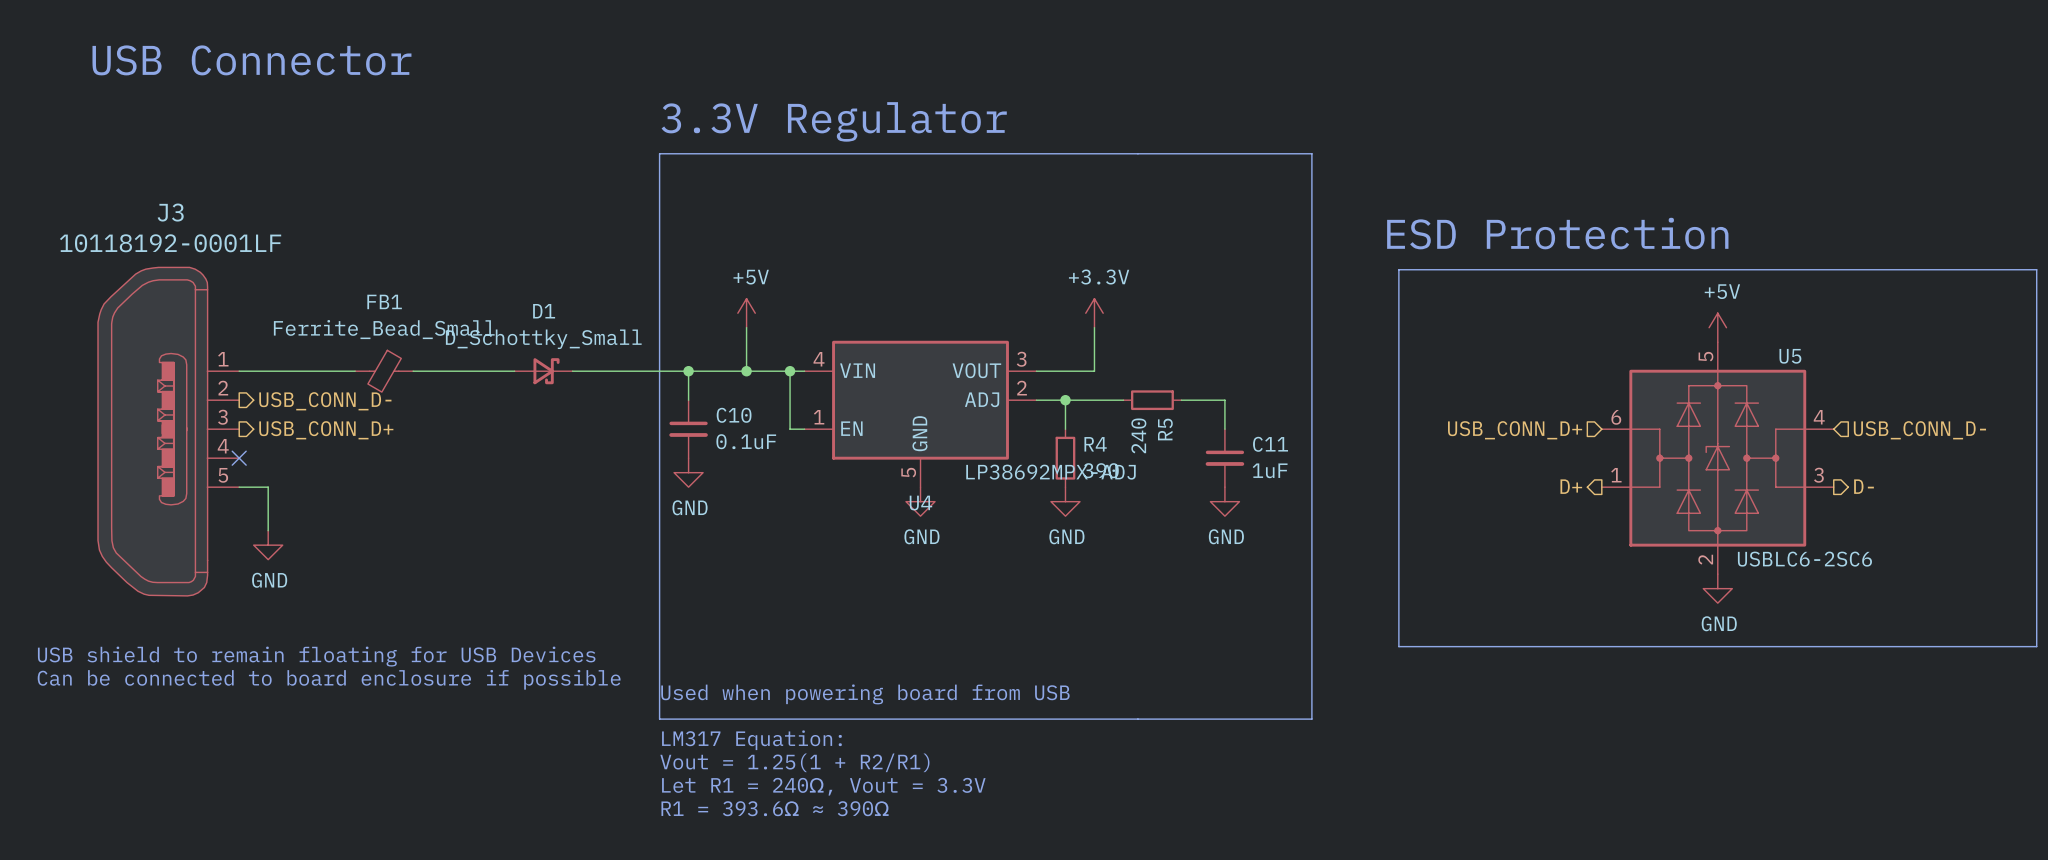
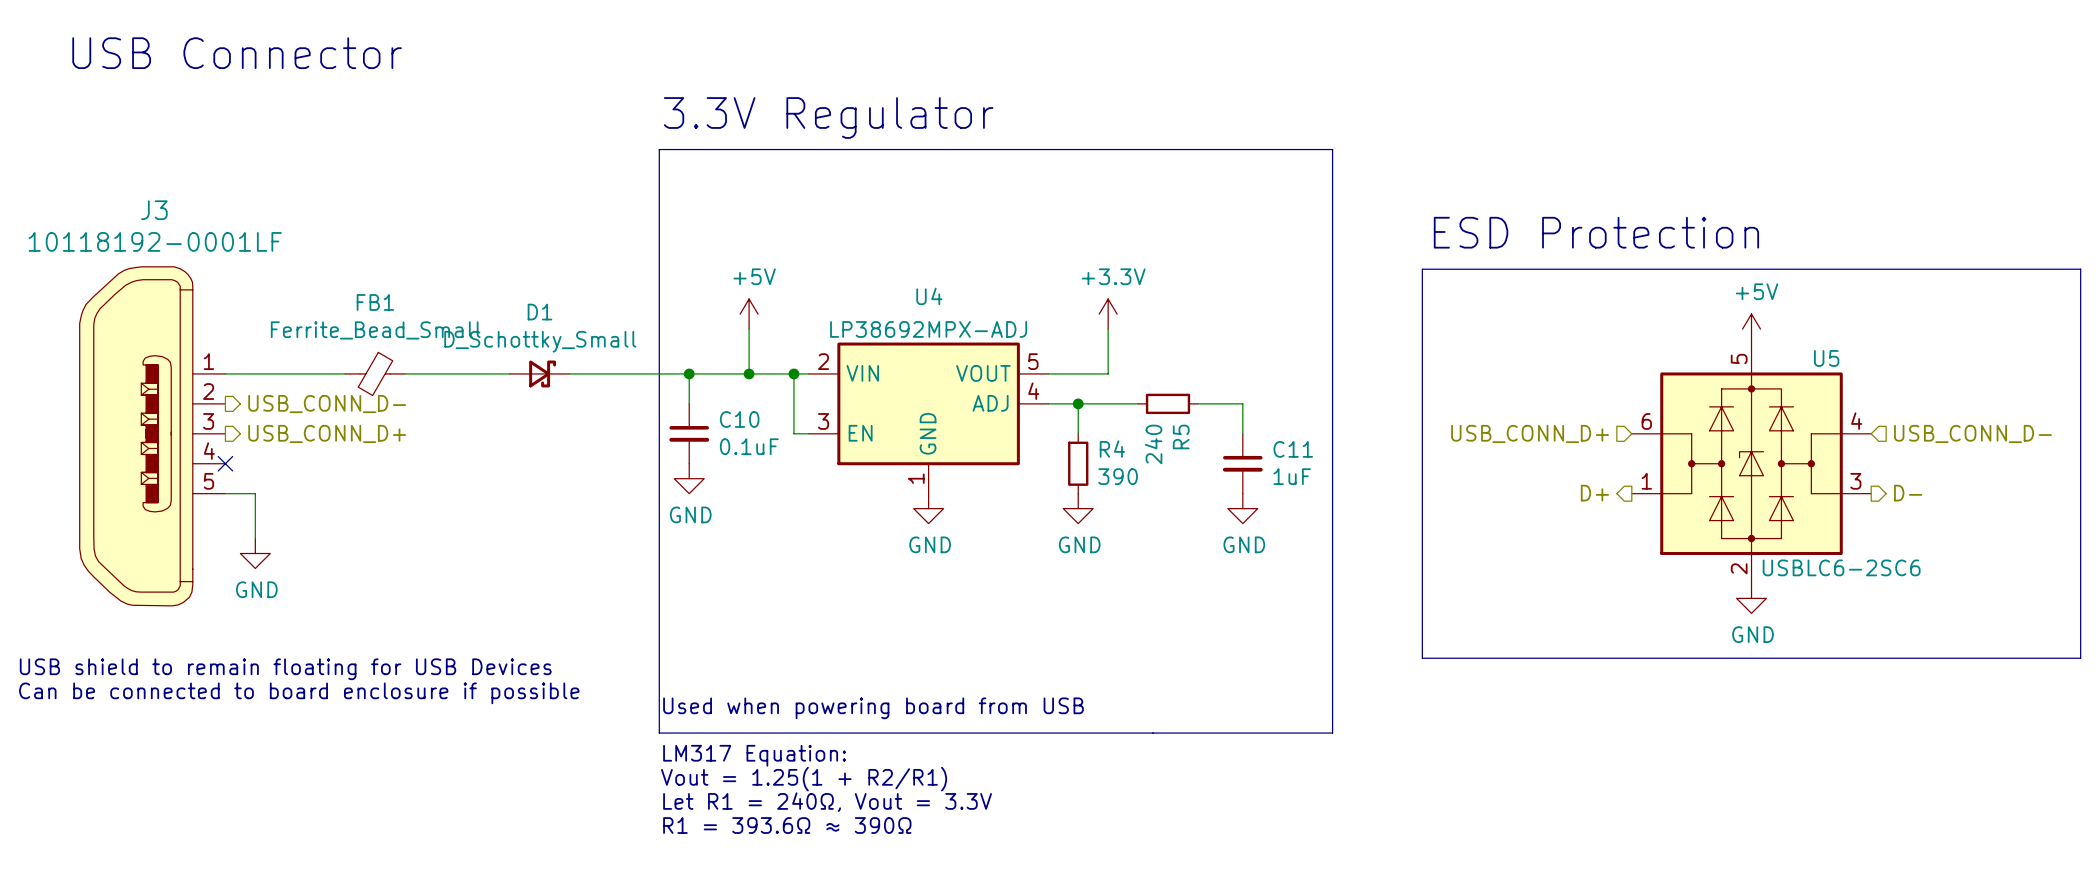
U4 pin number: 4 (819, 359) -> 2 (823, 361)
U4 pin number: 3 (1021, 359) -> 5 (1033, 361)
U4 pin number: 2 (1022, 388) -> 4 (1033, 391)
U4 pin number: 1 (819, 417) -> 3 (823, 421)
U4 pin number: 5 (908, 472) -> 1 (916, 478)
U4 value position: LP38692MPX-ADJ (1050, 472) -> LP38692MPX-ADJ (928, 329)
U4 name position: U4 (920, 503) -> U4 (929, 296)

